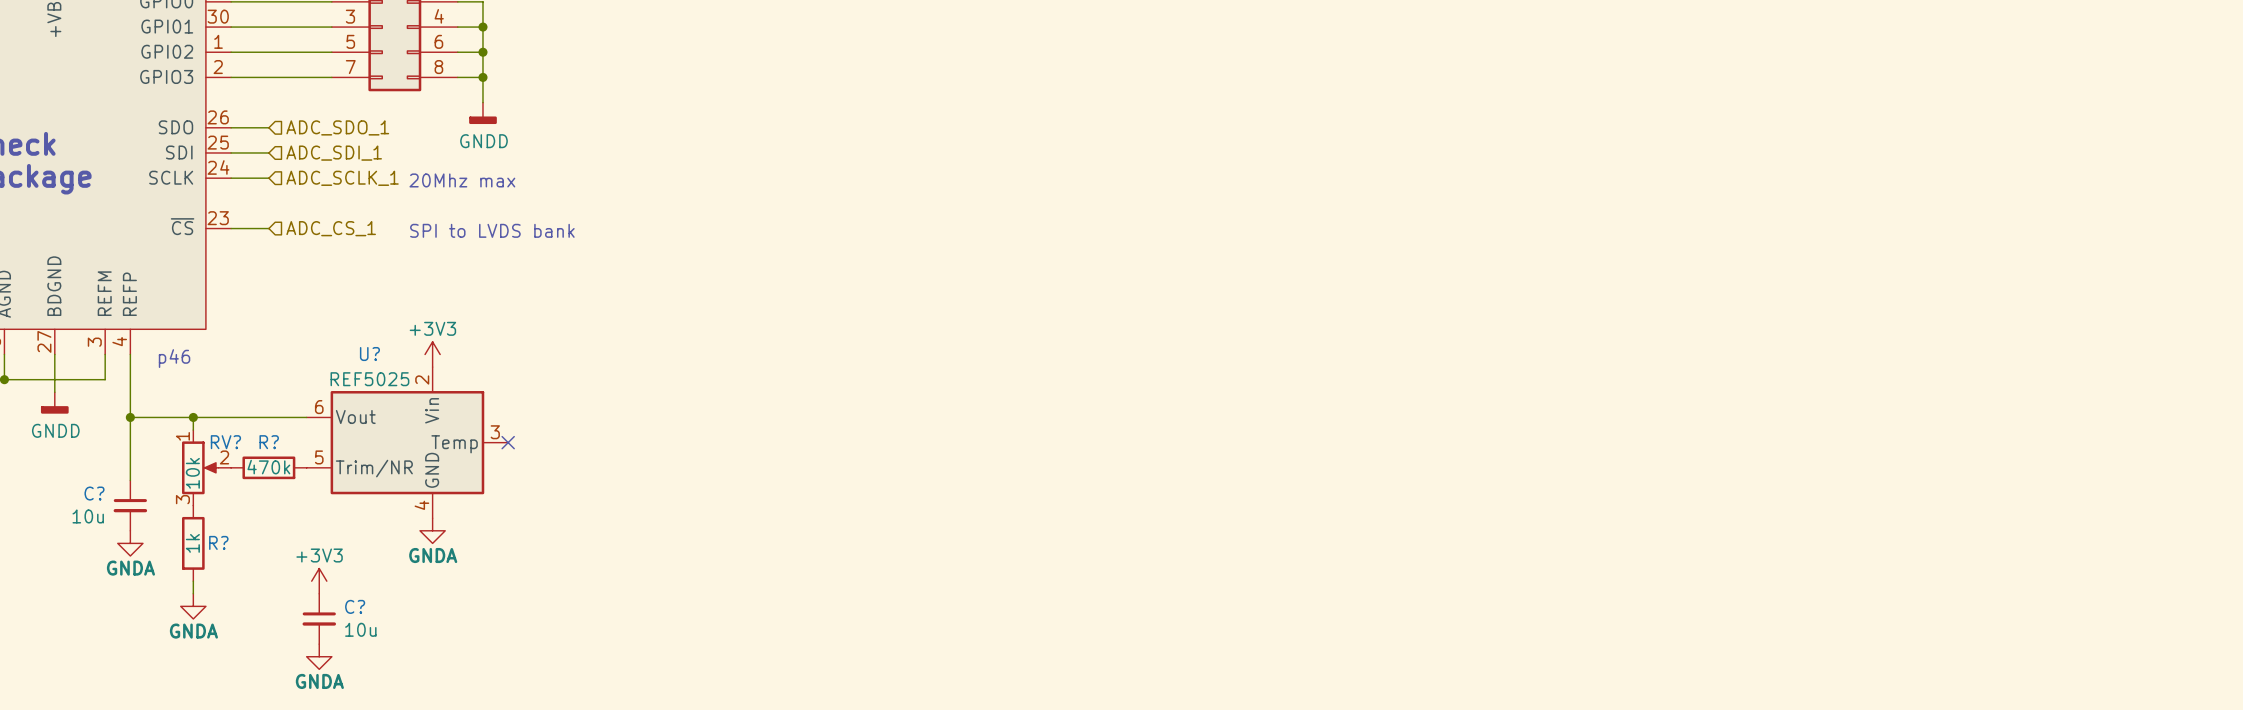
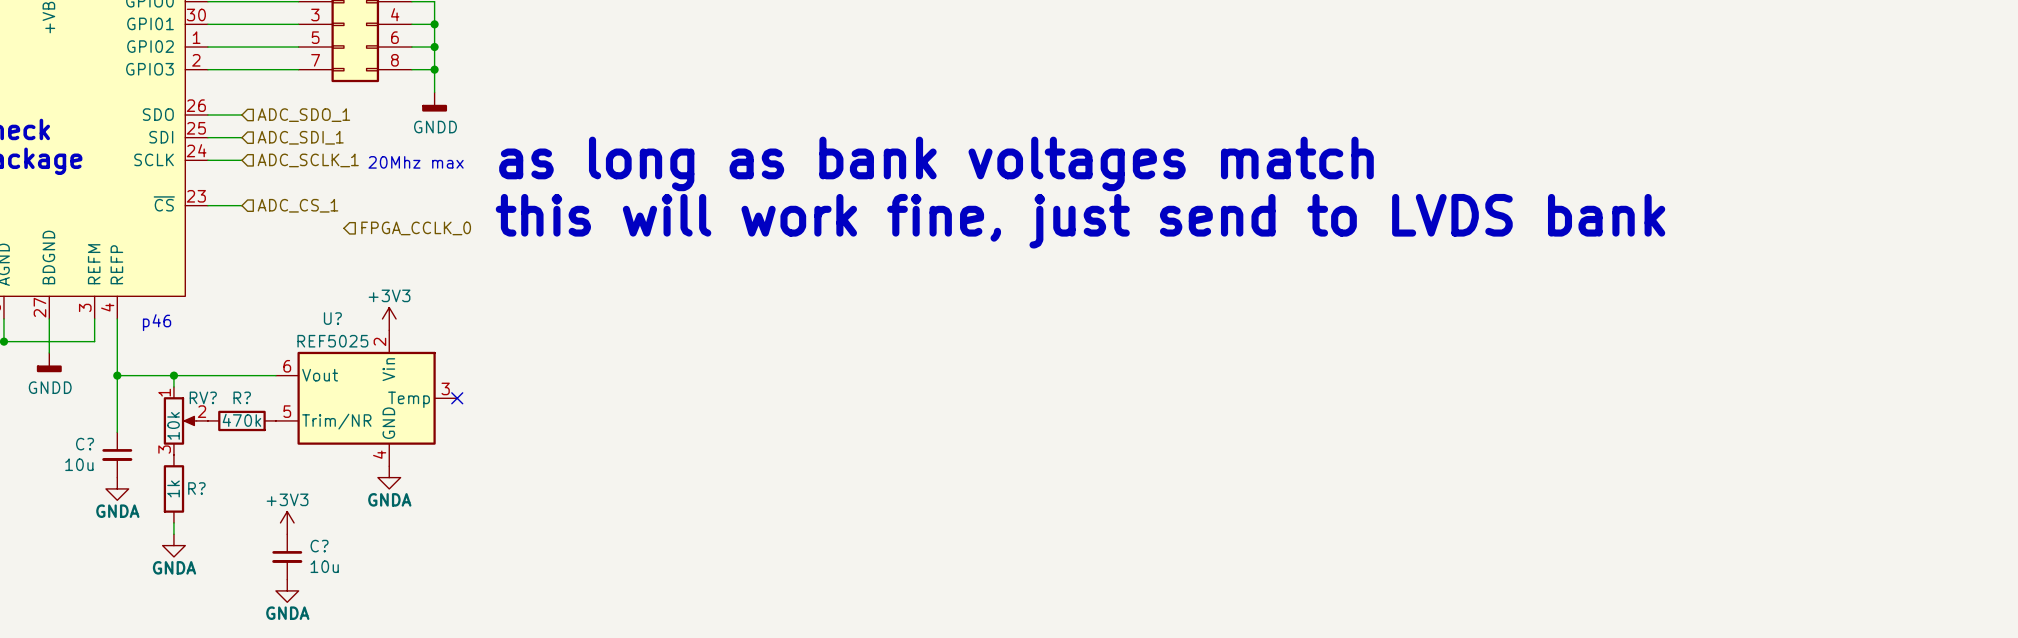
text: none -> as long as bank voltages match (936, 163)
text: SPI to LVDS bank (492, 230) -> none
text: none -> this will work fine, just send to LVDS bank (1080, 221)
hierarchical label: none -> FPGA_CCLK_0 (416, 228)

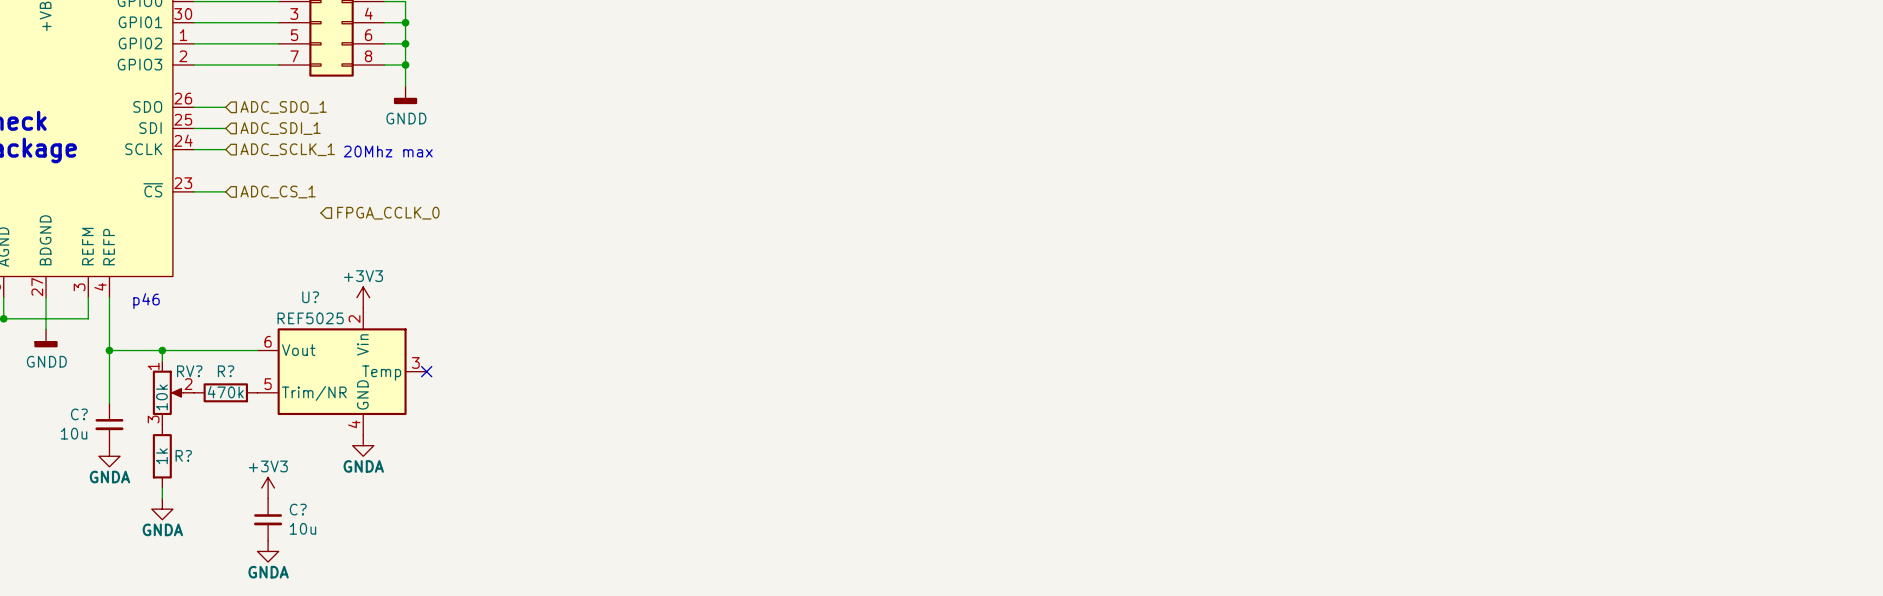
text: as long as bank voltages match (936, 163) -> none
text: this will work fine, just send to LVDS bank (1080, 221) -> none

